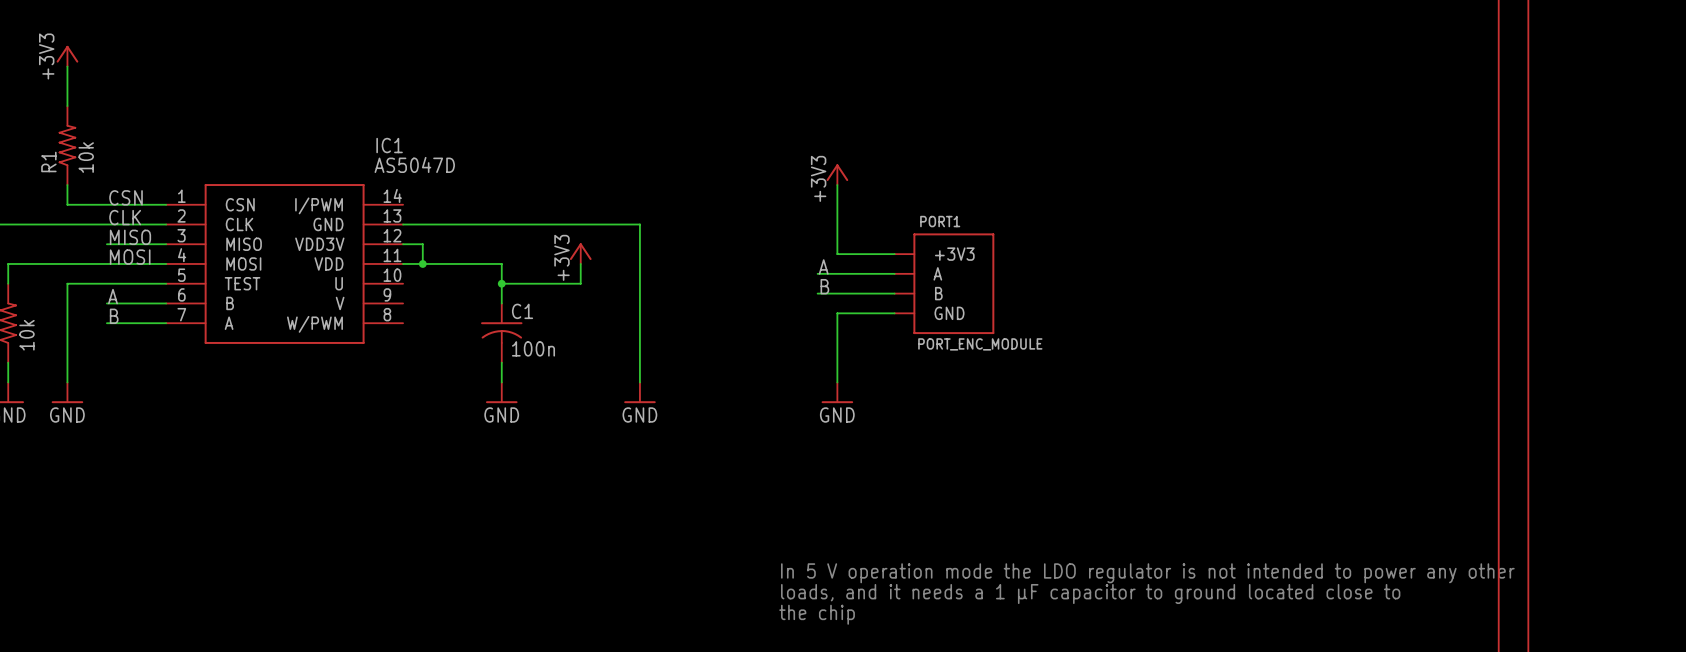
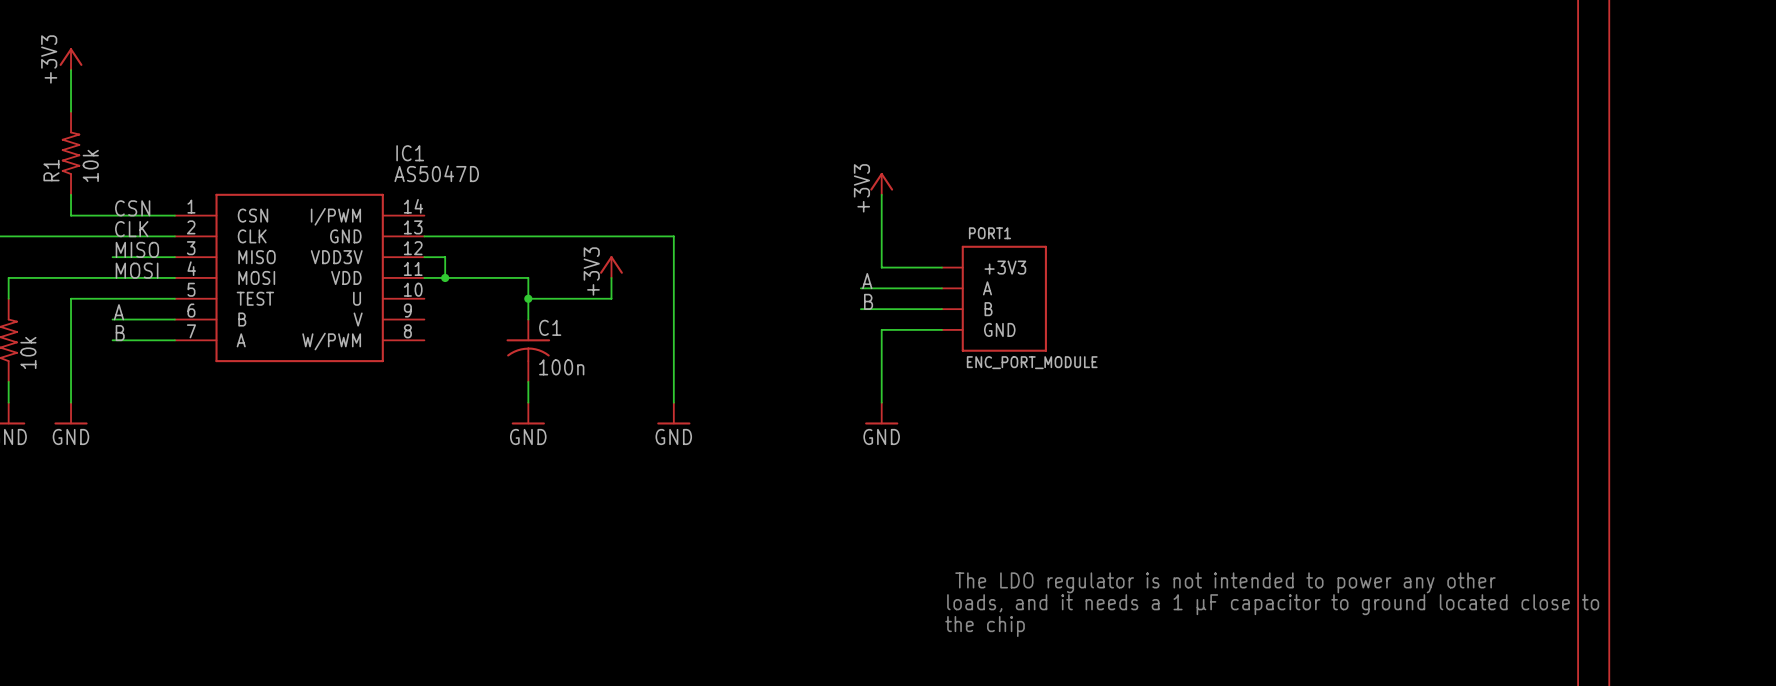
PORT1 value: PORT_ENC_MODULE (980, 344) -> ENC_PORT_MODULE (1032, 362)
text: In 5 V operation mode the LDO regulator is not intended to power any other (1147, 573) -> The LDO regulator is not intended to power any other (1225, 582)
text position: loads, and it needs a 1 μF capacitor to ground located close to (1090, 594) -> loads, and it needs a 1 μF capacitor to ground located close to (1273, 604)
text position: the chip (817, 614) -> the chip (985, 626)

